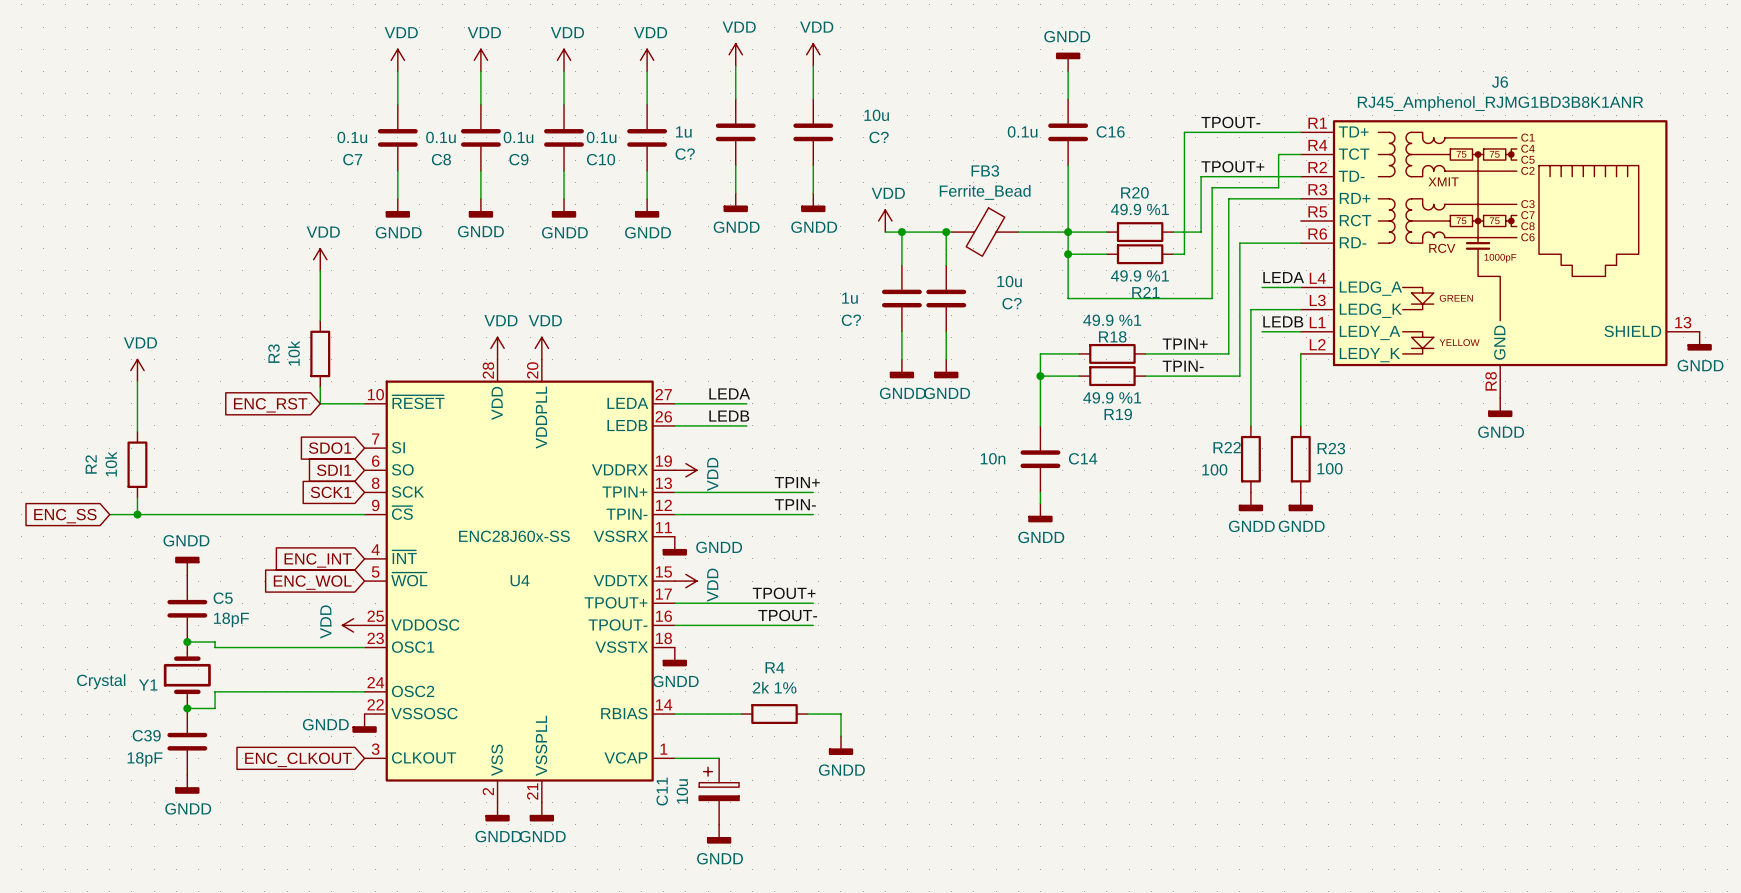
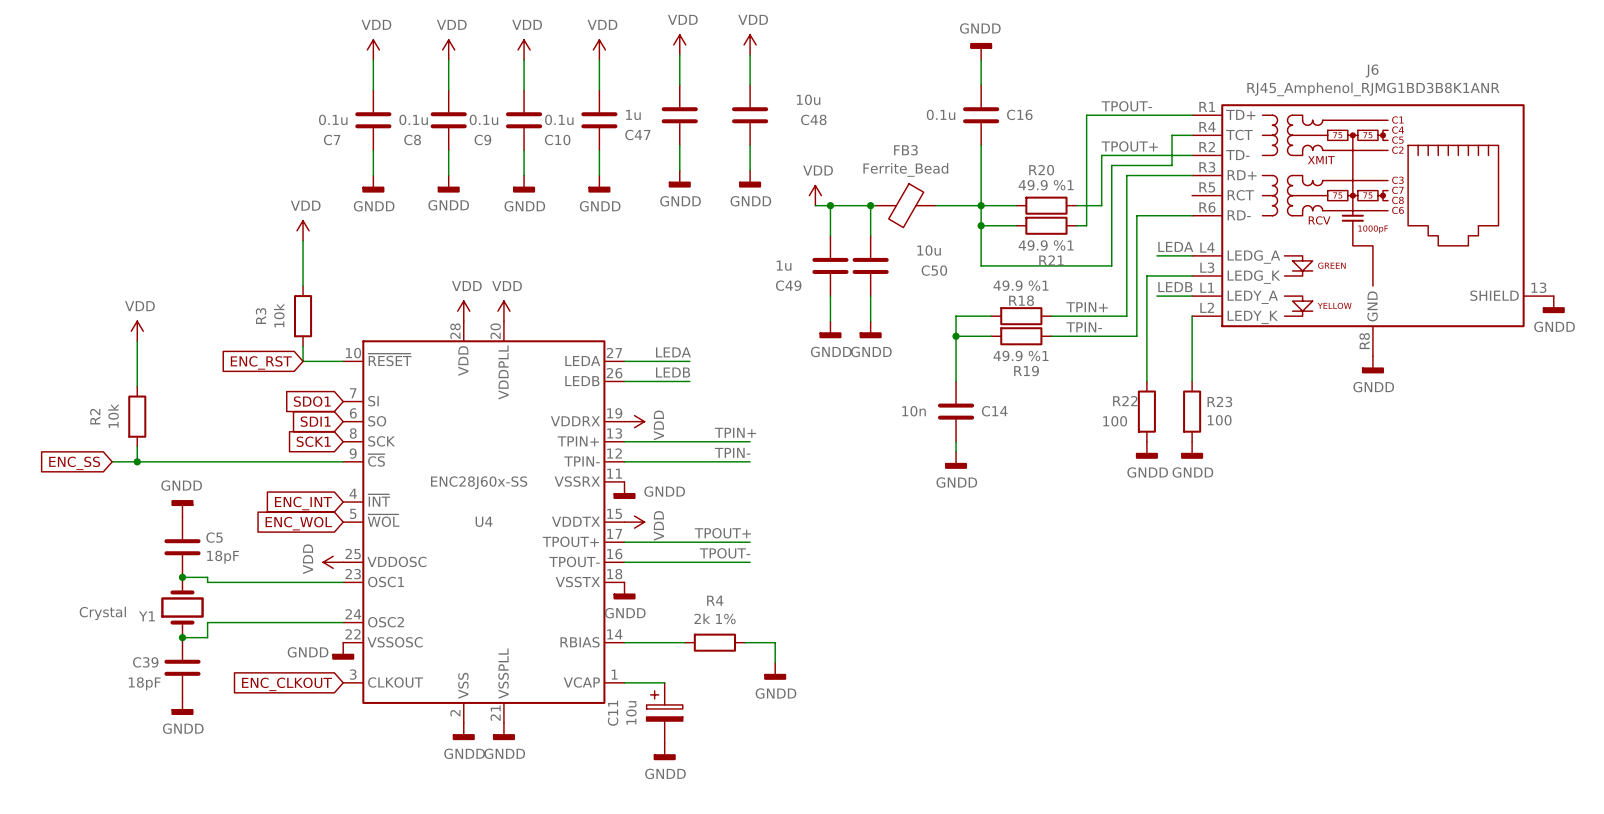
C? name: C? (879, 137) -> C48 (813, 119)
C? name: C? (685, 154) -> C47 (637, 134)
C? name: C? (1012, 303) -> C50 (934, 270)
C? name: C? (851, 320) -> C49 (788, 285)

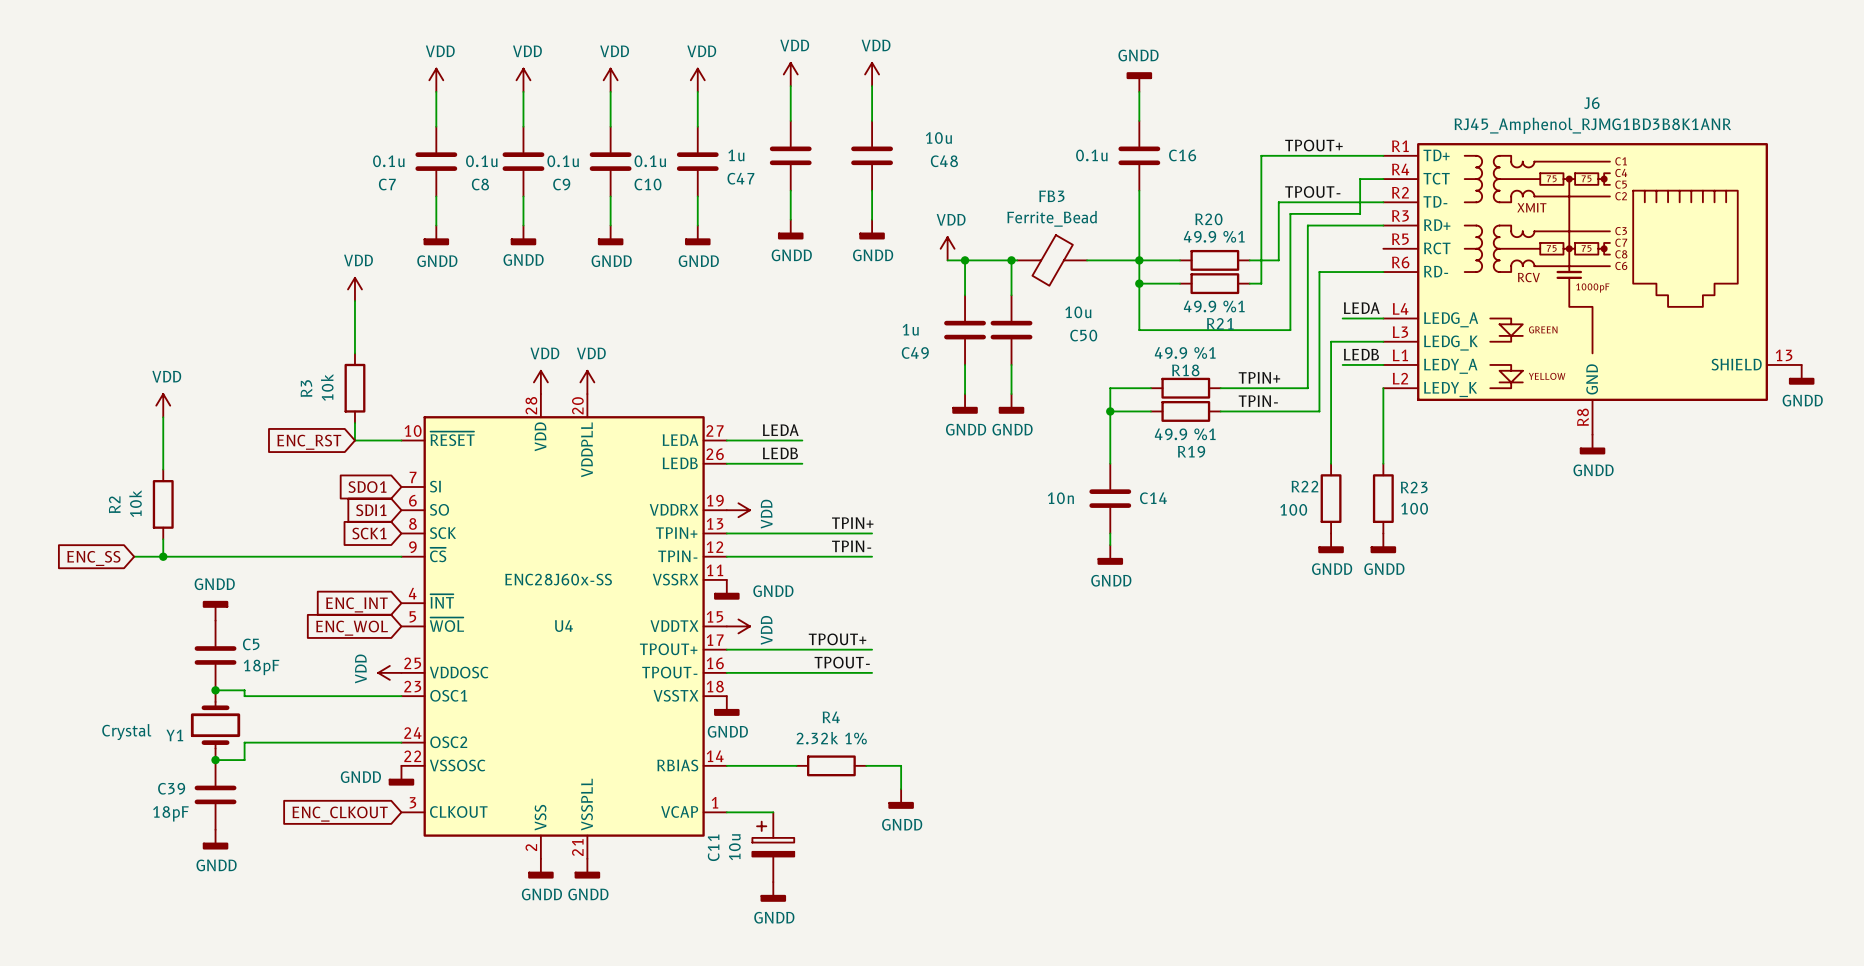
label: TPOUT- (1126, 106) -> TPOUT+ (1313, 145)
label: TPOUT+ (1129, 146) -> TPOUT- (1312, 191)
R4 value: 2k 1% (715, 618) -> 2.32k 1% (831, 738)

